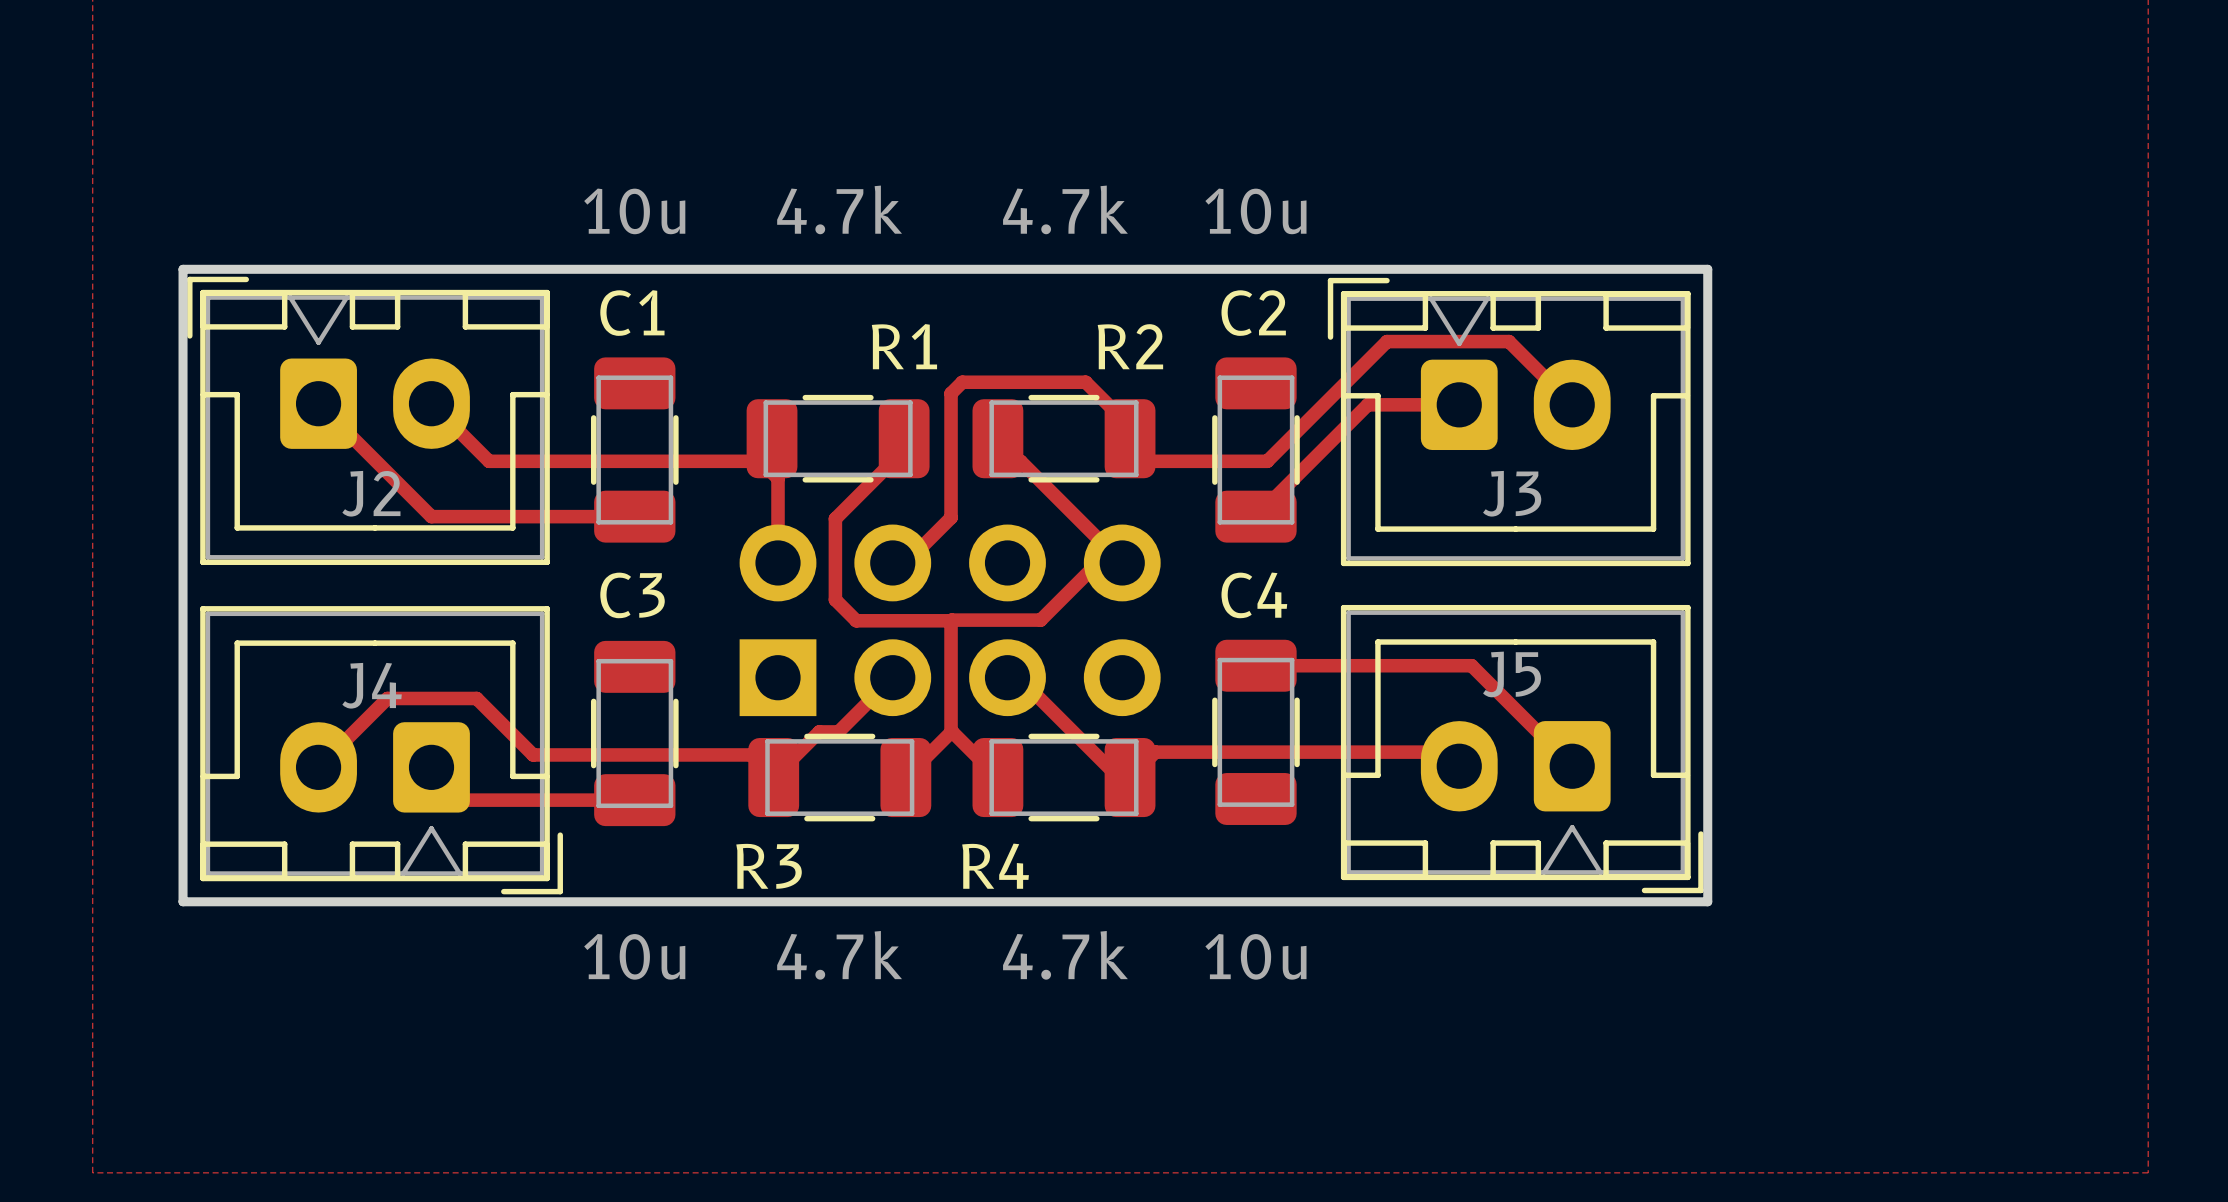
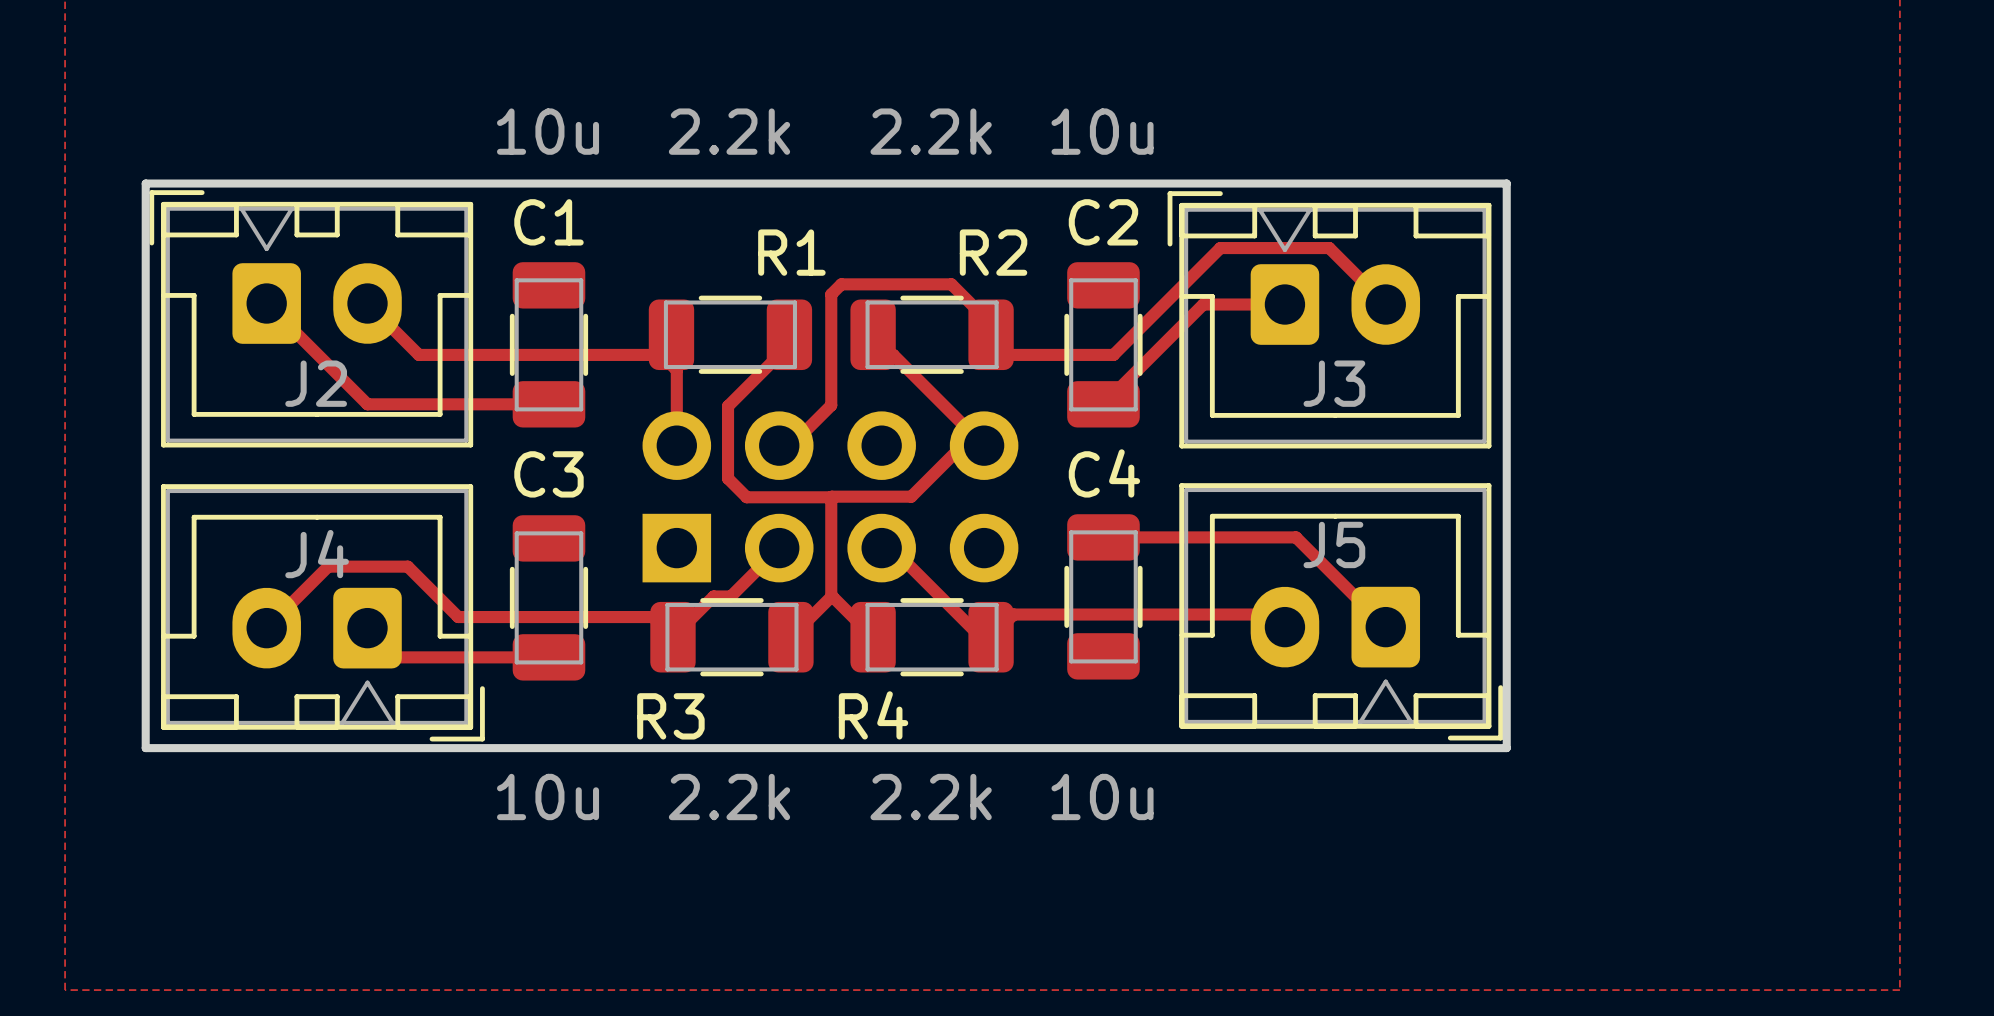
R1 value: 4.7k (839, 209) -> 2.2k (729, 131)
R2 value: 4.7k (1065, 209) -> 2.2k (931, 131)
R3 value: 4.7k (839, 955) -> 2.2k (729, 797)
R4 value: 4.7k (1065, 955) -> 2.2k (931, 797)

